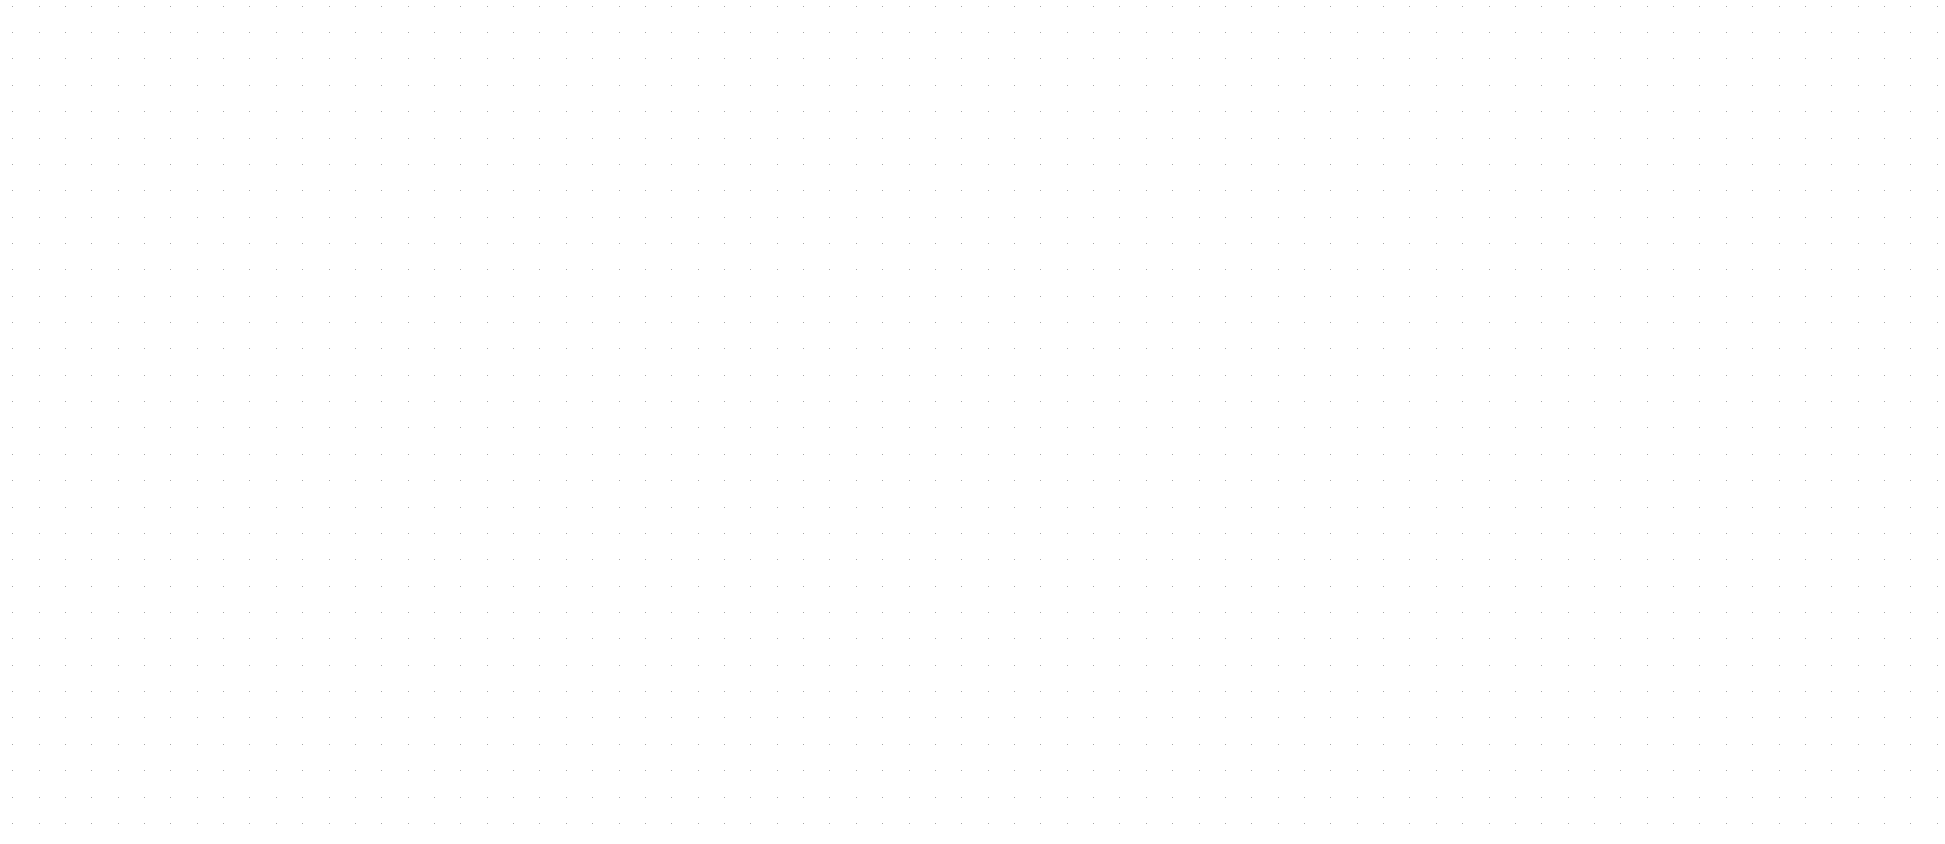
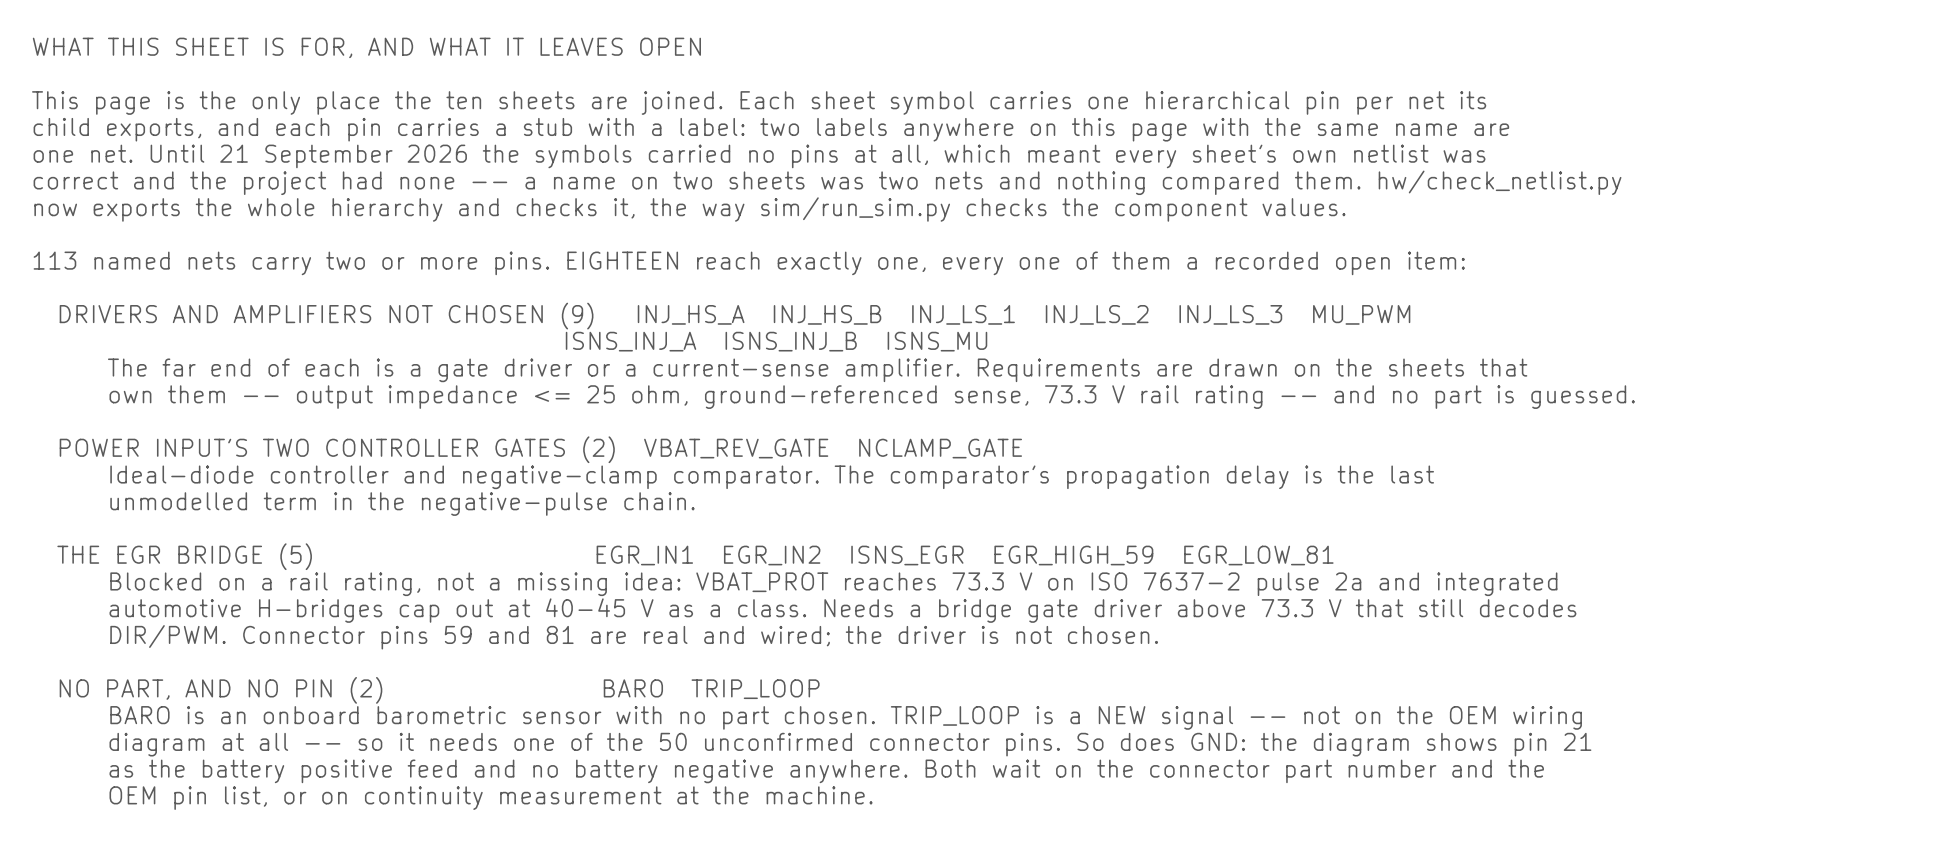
text: none -> WHAT THIS SHEET IS FOR, AND WHAT IT LEAVES OPEN (366, 47)
text: none -> This page is the only place the ten sheets are joined. Each sheet symbol carries one hierarchical pin per net its (759, 102)
text: none -> child exports, and each pin carries a stub with a label: two labels anywhere on this page with the same name are (771, 129)
text: none -> one net. Until 21 September 2026 the symbols carried no pins at all, which meant every sheet's own netlist was (759, 156)
text: none -> correct and the project had none -- a name on two sheets was two nets and nothing compared them. hw/check_netlist.py (827, 182)
text: none -> now exports the whole hierarchy and checks it, the way sim/run_sim.py checks the component values. (689, 209)
text: none -> 113 named nets carry two or more pins. EIGHTEEN reach exactly one, every one of them a recorded open item: (749, 263)
text: none -> DRIVERS AND AMPLIFIERS NOT CHOSEN (9) INJ_HS_A INJ_HS_B INJ_LS_1 INJ_LS_2 INJ_LS_3 MU_PWM (735, 316)
text: none -> ISNS_INJ_A ISNS_INJ_B ISNS_MU (776, 341)
text: none -> The far end of each is a gate driver or a current-sense amplifier. Requirements are drawn on the sheets that (817, 370)
text: none -> own them -- output impedance <= 25 ohm, ground-referenced sense, 73.3 V rail rating -- and no part is guessed. (872, 397)
text: none -> POWER INPUT'S TWO CONTROLLER GATES (2) VBAT_REV_GATE NCLAMP_GATE (540, 449)
text: none -> Ideal-diode controller and negative-clamp comparator. The comparator's propagation delay is the last (772, 477)
text: none -> unmodelled term in the negative-pulse chain. (402, 504)
text: none -> THE EGR BRIDGE (5) EGR_IN1 EGR_IN2 ISNS_EGR EGR_HIGH_59 EGR_LOW_81 (695, 556)
text: none -> Blocked on a rail rating, not a missing idea: VBAT_PROT reaches 73.3 V on ISO 7637-2 pulse 2a and integrated (833, 584)
text: none -> automotive H-bridges cap out at 40-45 V as a class. Needs a bridge gate driver above 73.3 V that still decodes (842, 610)
text: none -> DIR/PWM. Connector pins 59 and 81 are real and wired; the driver is not chosen. (634, 637)
text: none -> NO PART, AND NO PIN (2) BARO TRIP_LOOP (439, 690)
text: none -> BARO is an onboard barometric sensor with no part chosen. TRIP_LOOP is a NEW signal -- not on the OEM wiring (846, 717)
text: none -> diagram at all -- so it needs one of the 50 unconfirmed connector pins. So does GND: the diagram shows pin 21 (850, 744)
text: none -> as the battery positive feed and no battery negative anywhere. Both wait on the connector part number and the (826, 771)
text: none -> OEM pin list, or on continuity measurement at the machine. (491, 798)

